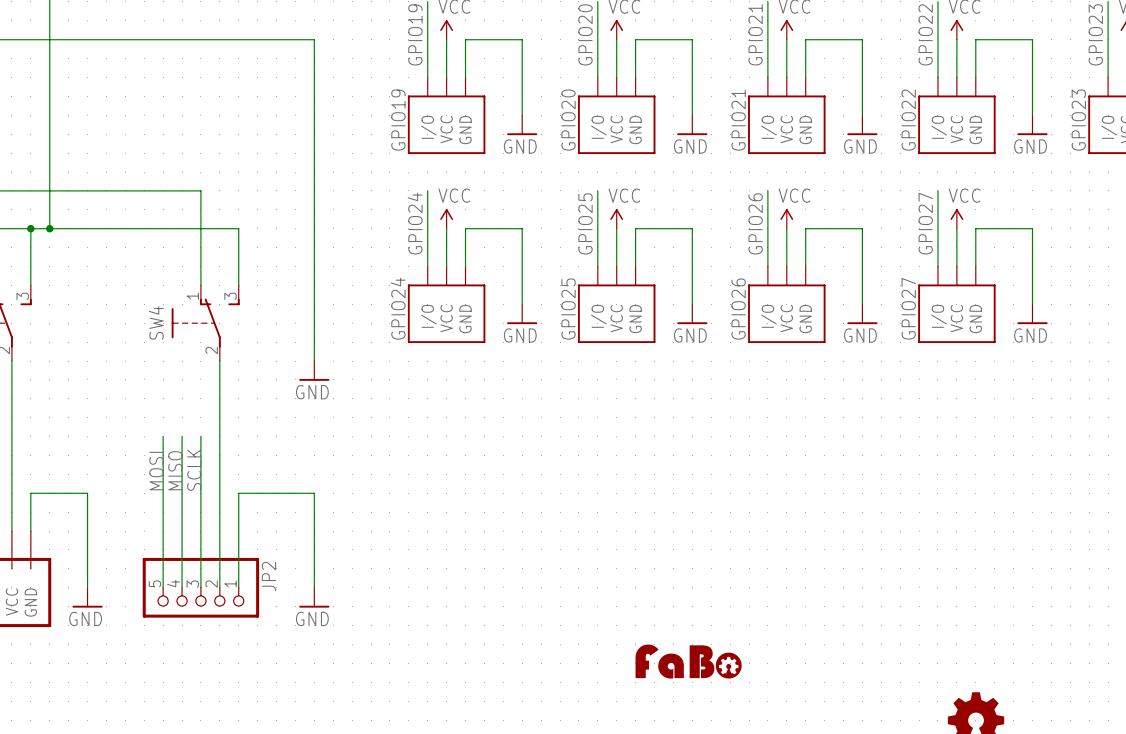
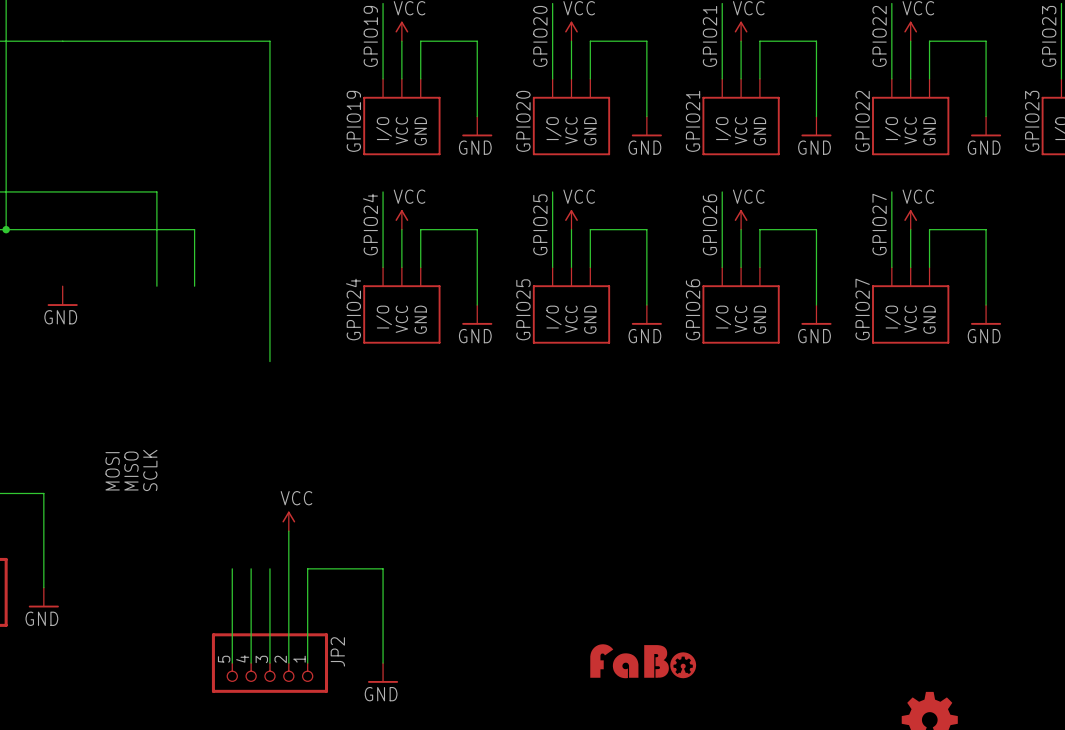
power symbol: none -> GND (62, 296)
SW4: (205, 323) -> none
wire: (219, 361) (219, 587) -> none
power symbol: GND (314, 370) -> none
wire: (163, 436) (163, 587) -> none
wire: (182, 436) (182, 587) -> none
wire: (200, 436) (200, 587) -> none
power symbol: none -> VCC (288, 521)
wire: none -> (288, 531) (288, 663)
wire: none -> (232, 568) (232, 663)
wire: none -> (251, 568) (251, 663)
wire: (314, 568) (314, 493) (238, 493) (238, 587) -> none
JP2 position: (200, 587) -> (269, 663)
wire: none -> (269, 587) (269, 663)
power symbol position: GND (314, 597) -> GND (383, 672)
wire: none -> (307, 663) (307, 568) (383, 568) (383, 663)

